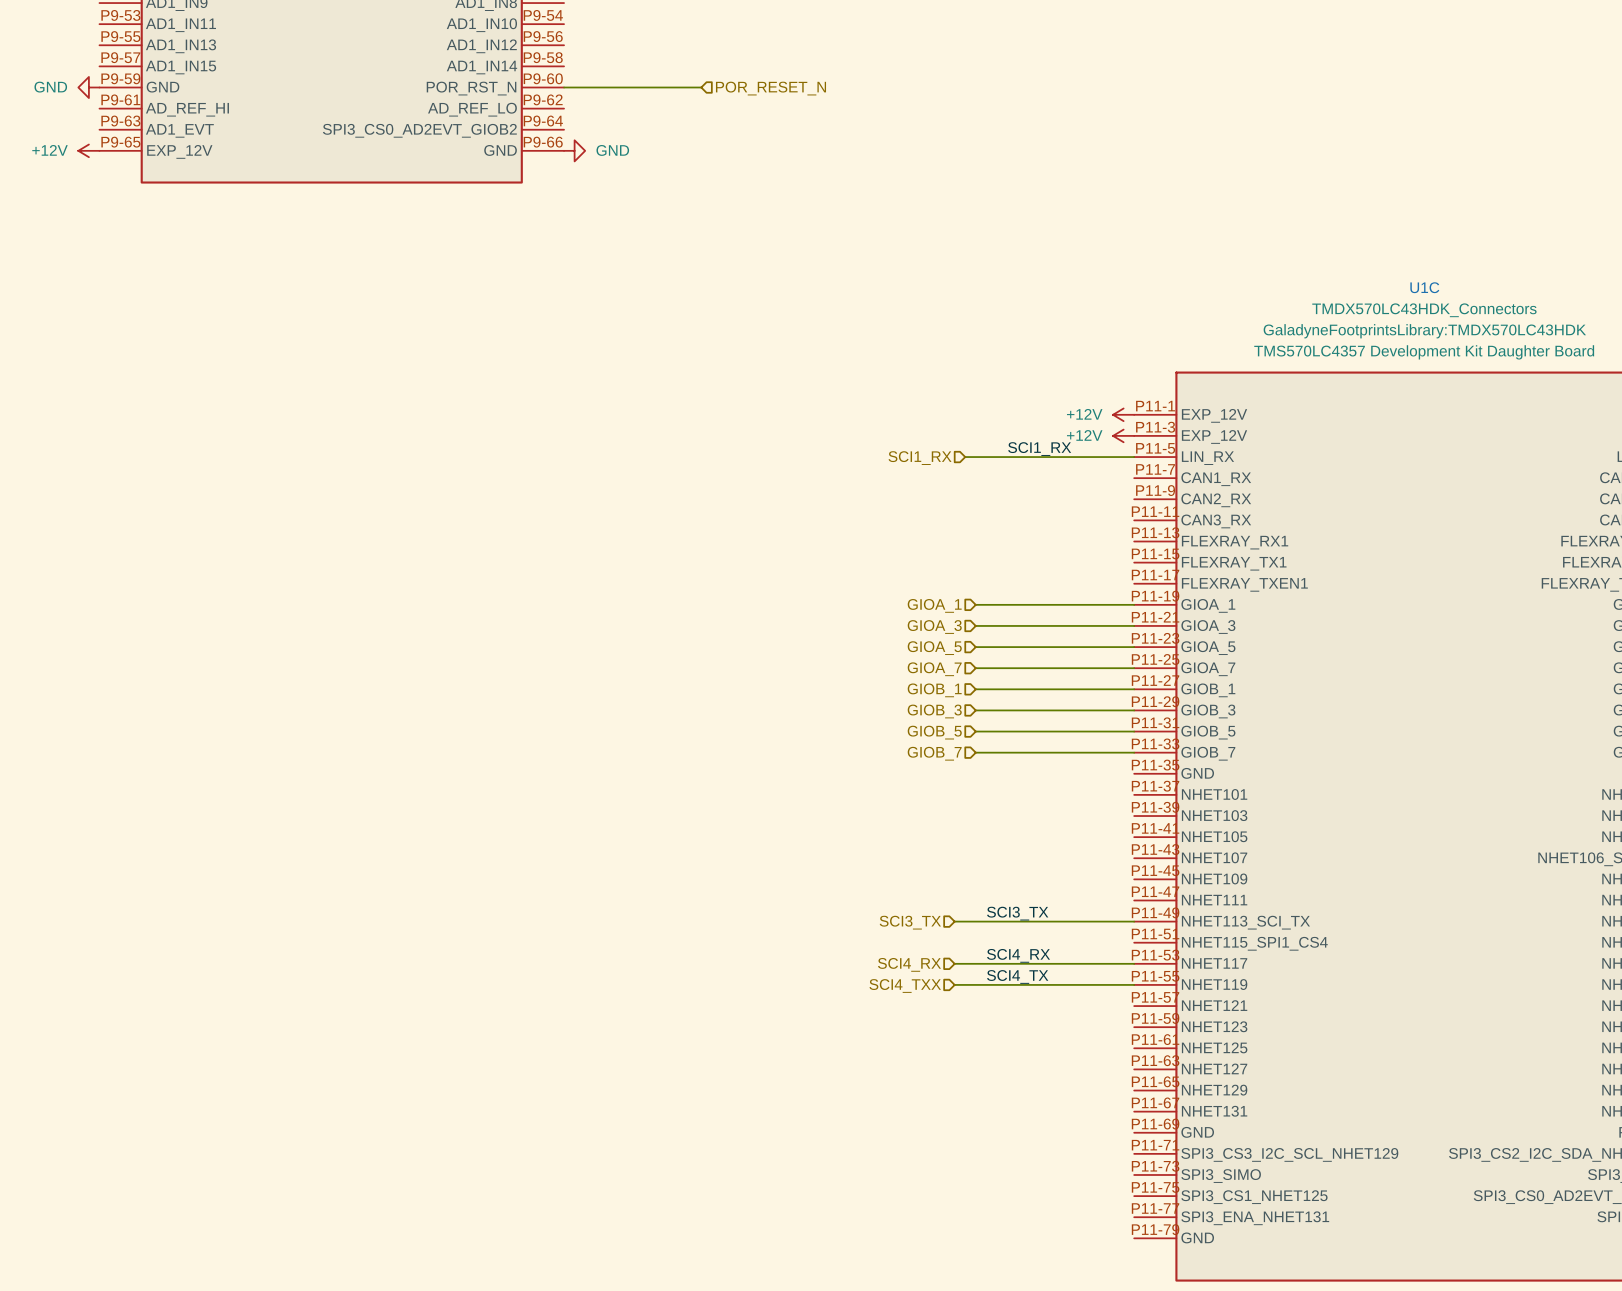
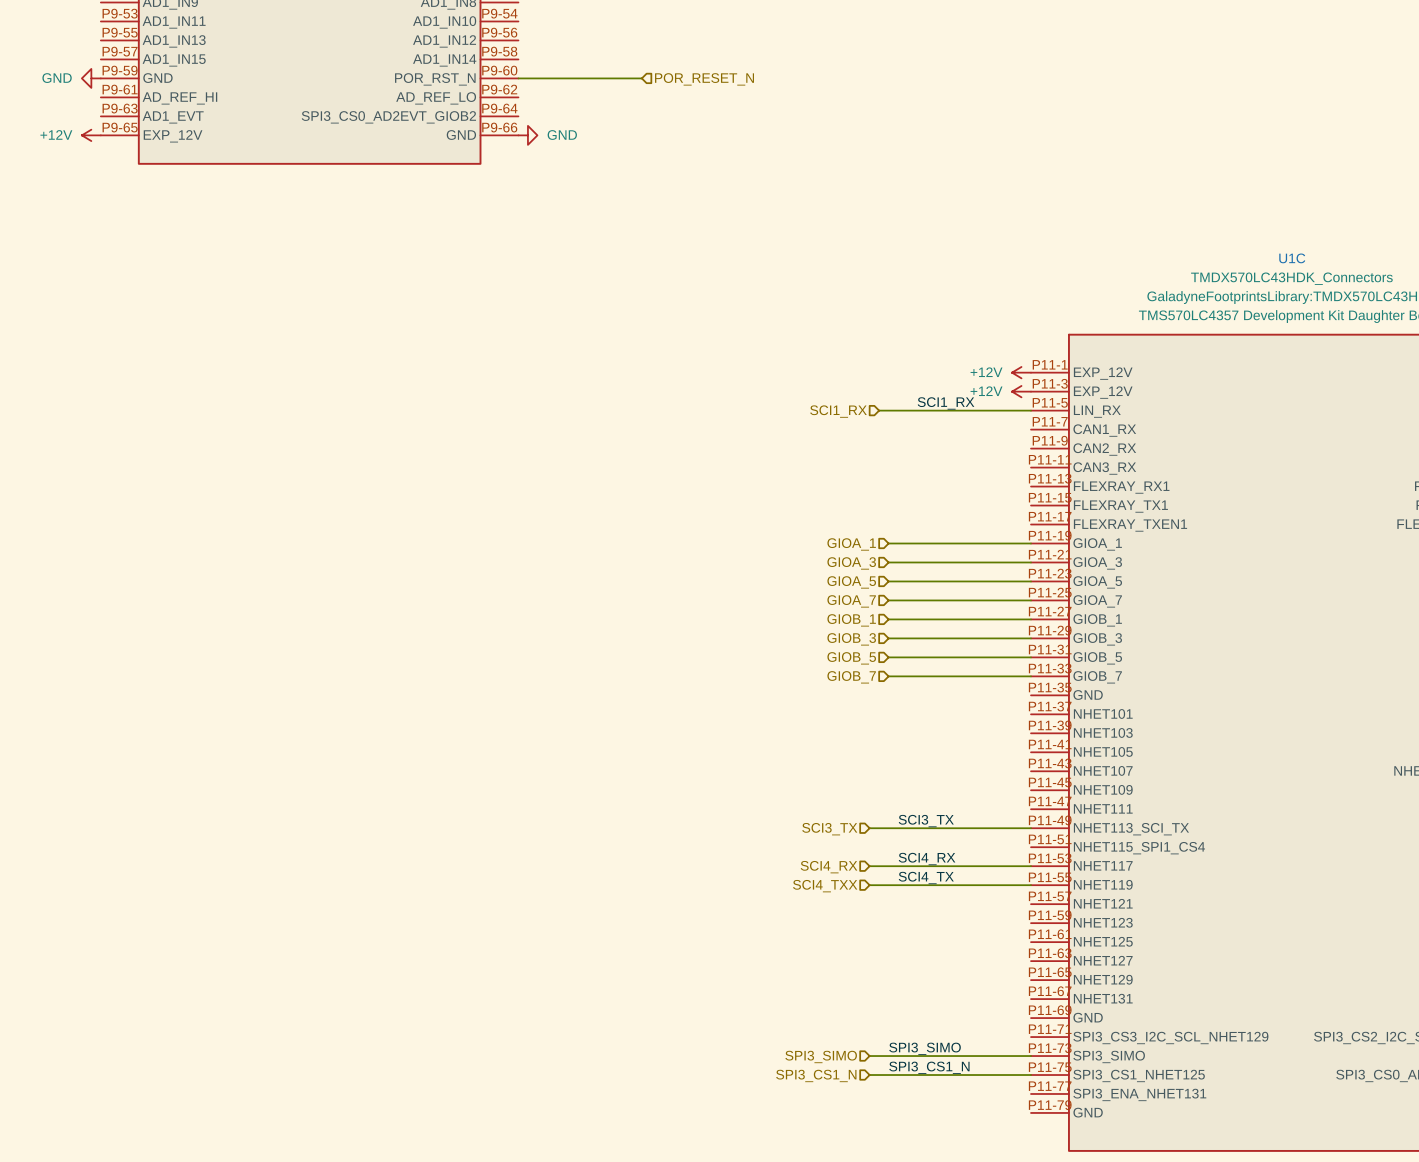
label: none -> SPI3_SIMO (925, 1048)
wire: none -> (869, 1056) (1030, 1056)
hierarchical label: none -> SPI3_SIMO (821, 1056)
label: none -> SPI3_CS1_N (929, 1067)
wire: none -> (869, 1075) (1030, 1075)
hierarchical label: none -> SPI3_CS1_N (816, 1075)

